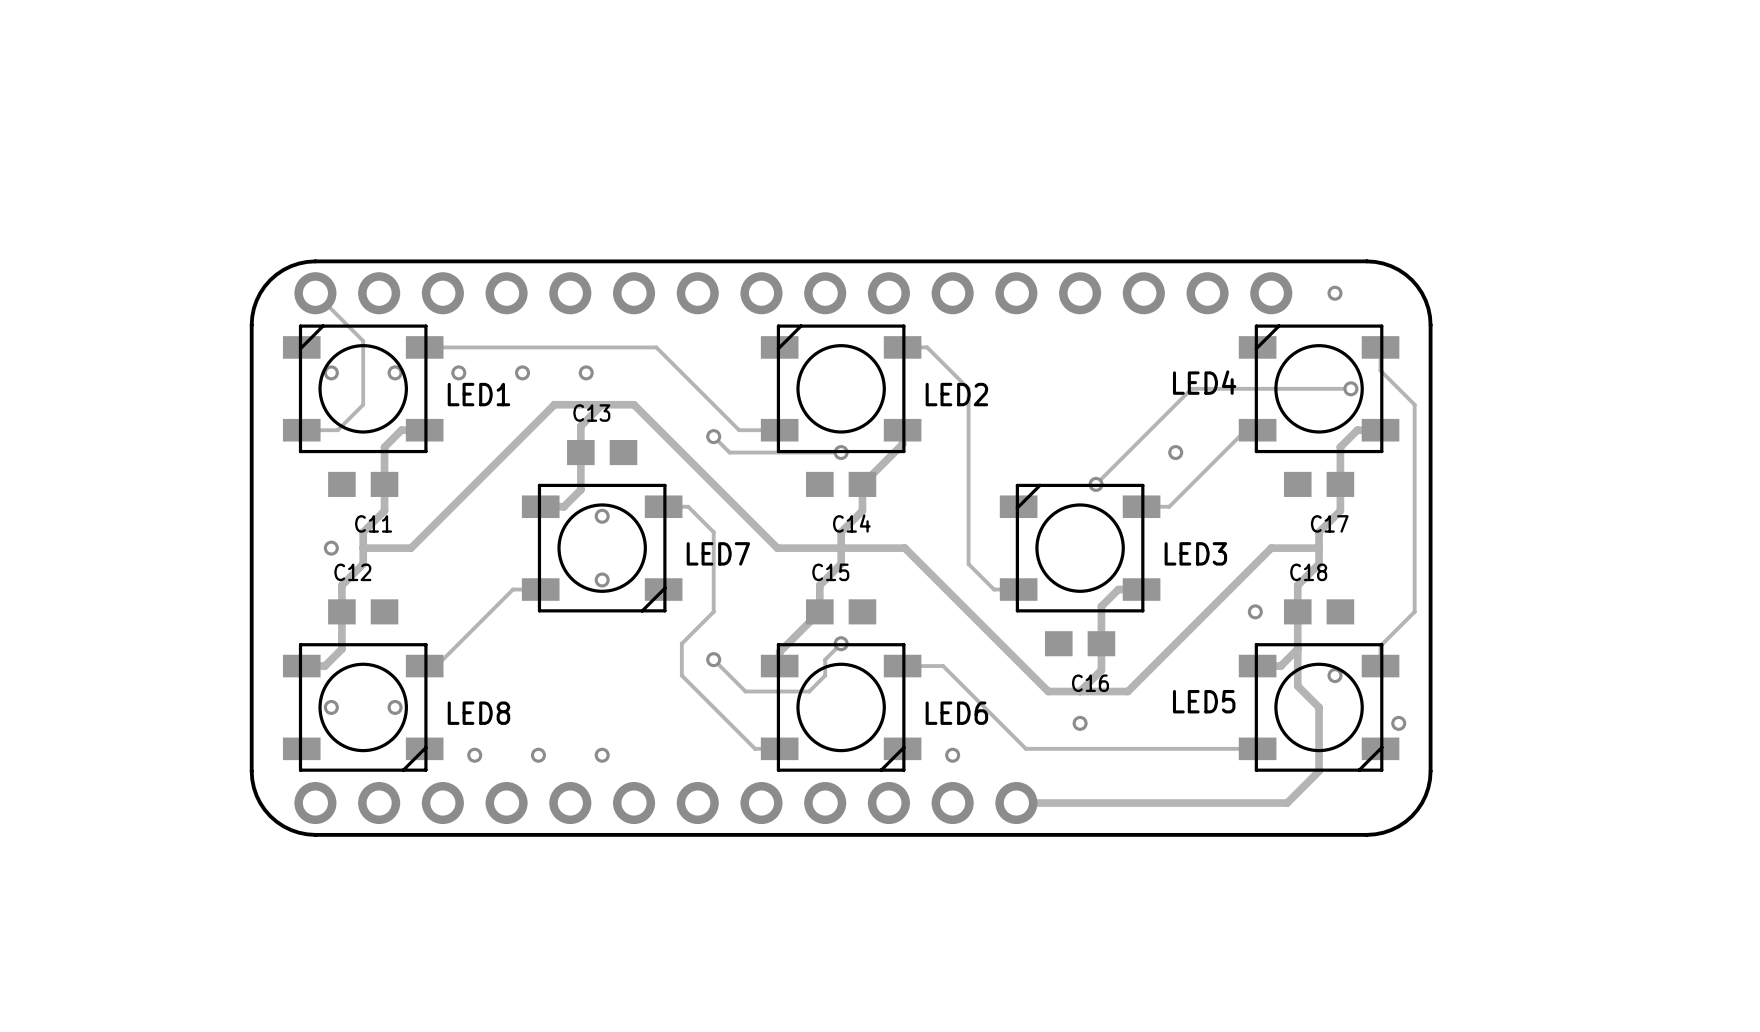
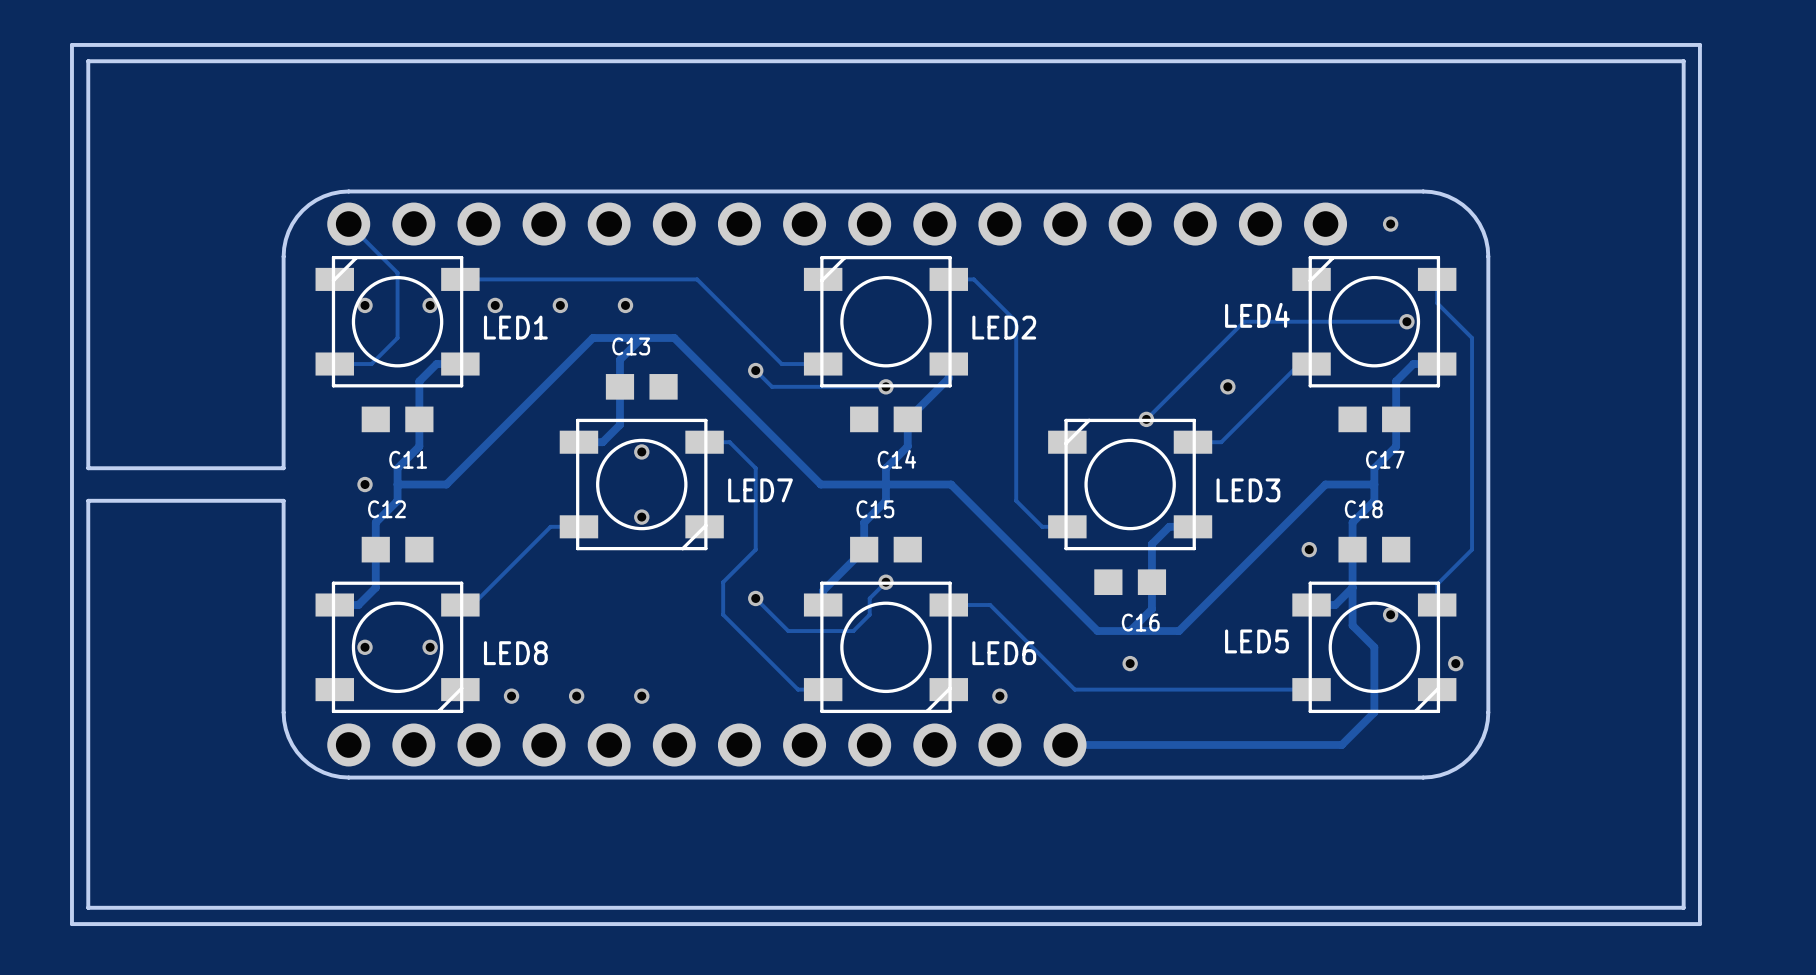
board edge: none -> (71, 44) (71, 924) (1699, 924) (1699, 44) (71, 44)
board edge: (251, 532) (251, 564) -> (283, 468) (88, 468) (88, 61) (1683, 61) (1683, 907) (88, 907) (88, 500) (283, 500)

